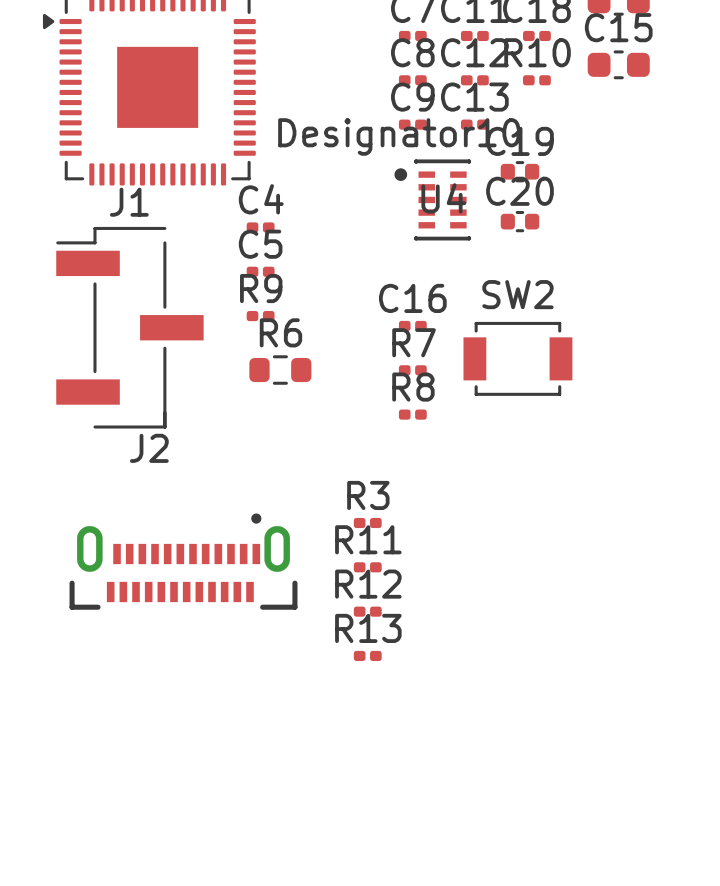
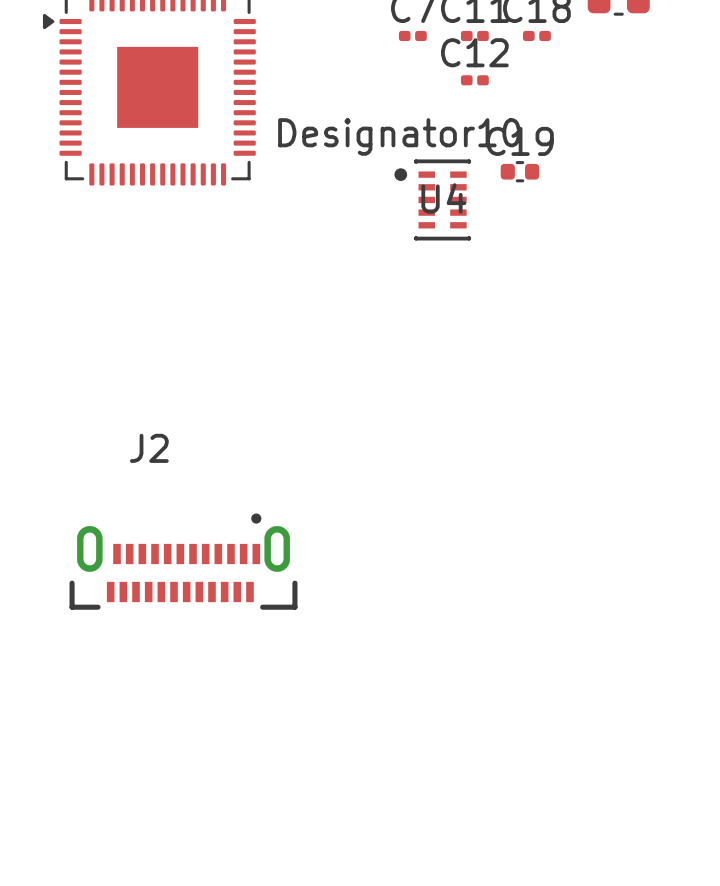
C15: (618, 64) -> none
C8: (412, 80) -> none
R10: (536, 80) -> none
C9: (412, 124) -> none
C13: (474, 124) -> none
C20: (519, 221) -> none
C4: (260, 227) -> none
C5: (260, 271) -> none
R9: (260, 316) -> none
C16: (412, 325) -> none
J1: (129, 327) -> none
SW2: (517, 358) -> none
R6: (280, 370) -> none
R7: (412, 370) -> none
R8: (412, 414) -> none
R3: (367, 522) -> none
R11: (367, 567) -> none
R12: (367, 611) -> none
R13: (367, 655) -> none

